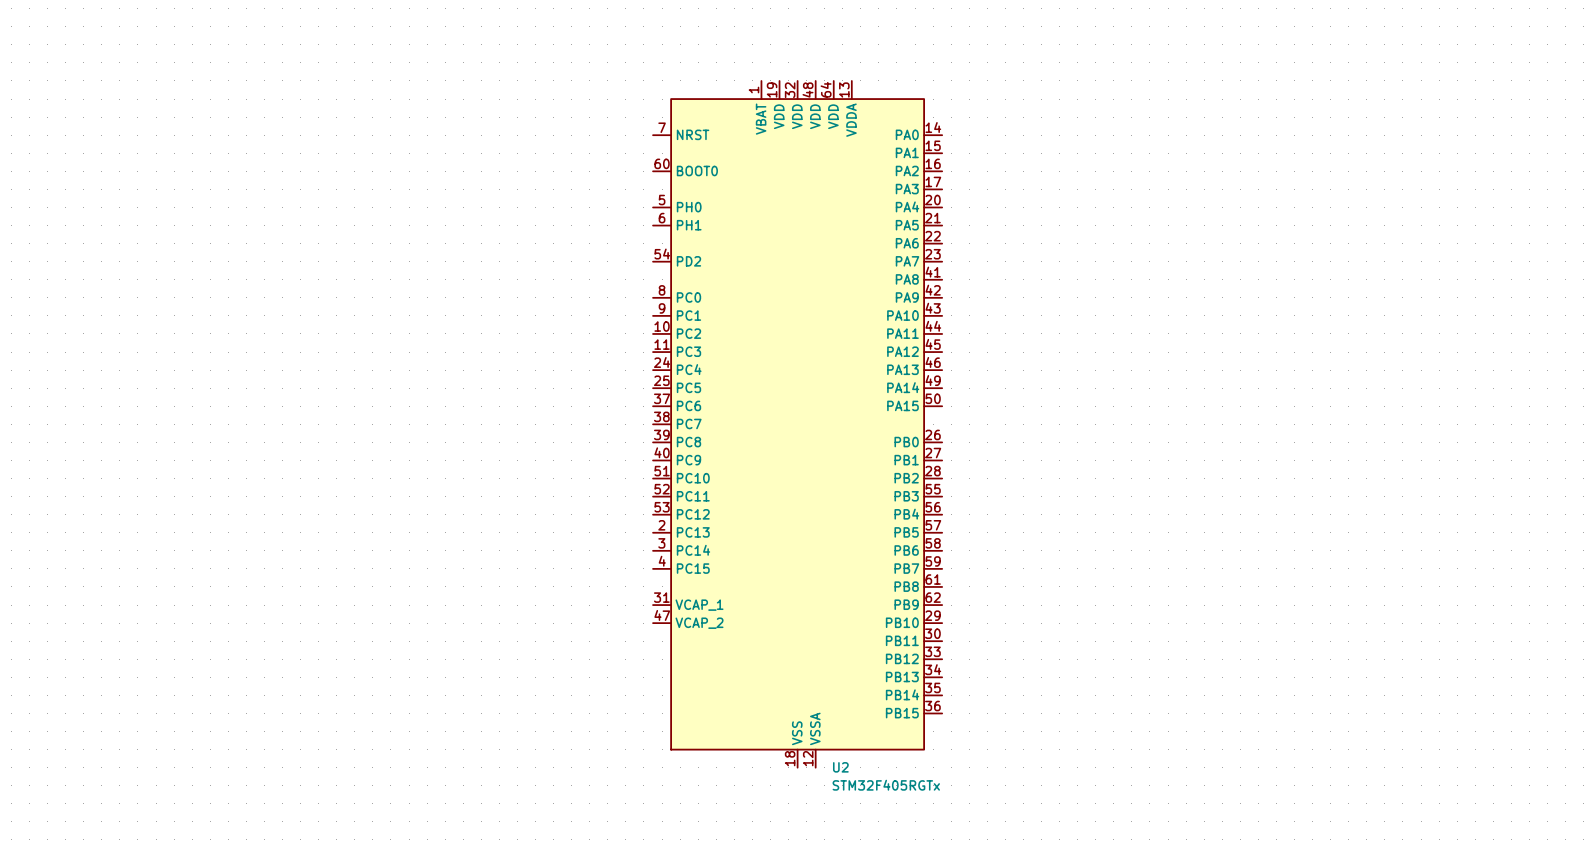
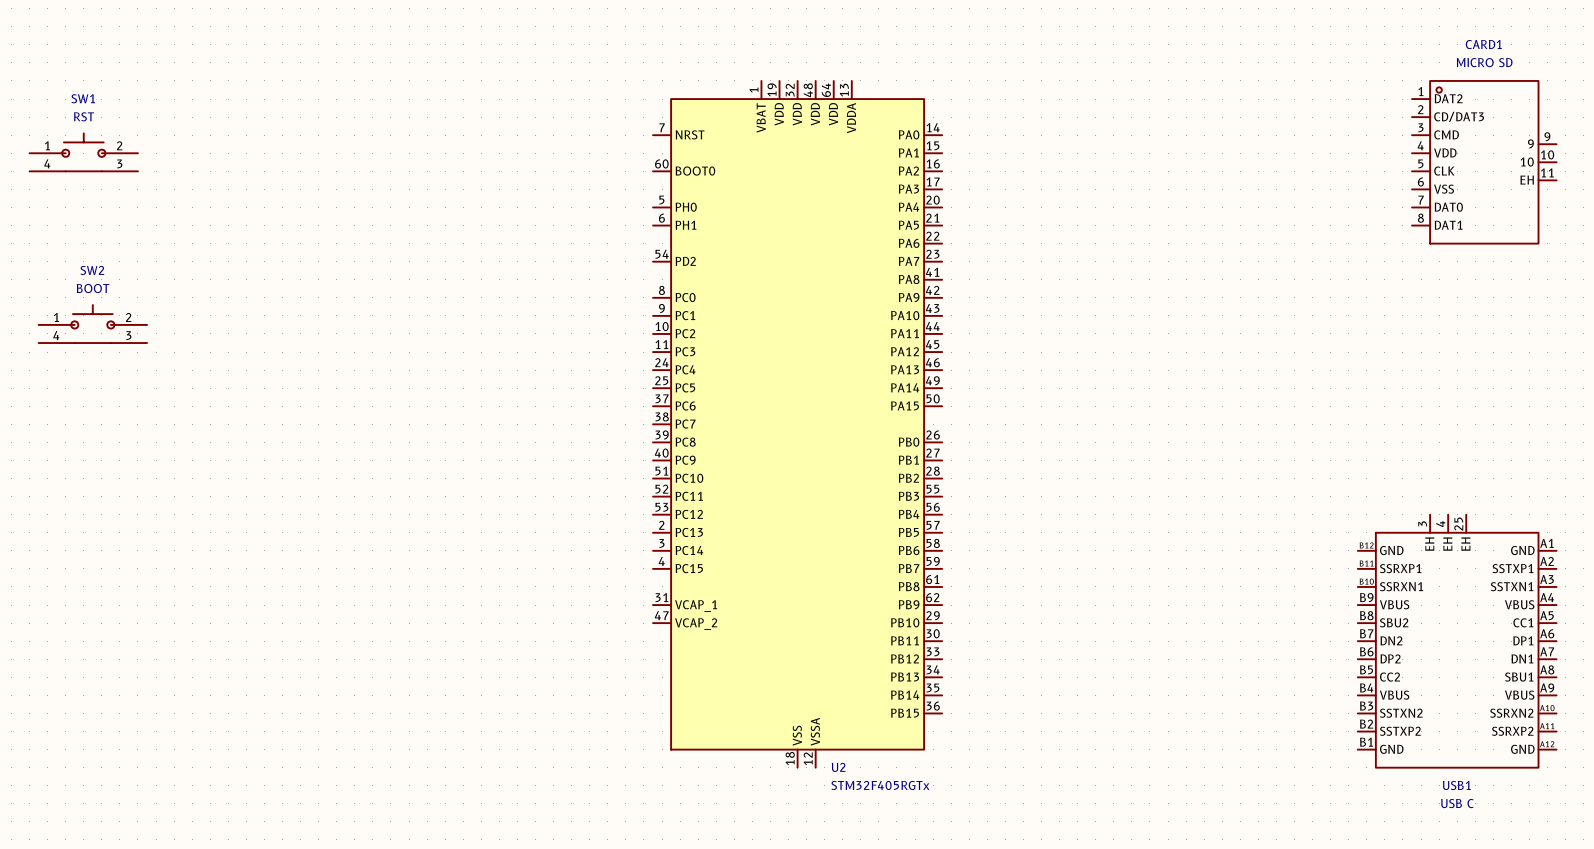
SW1: none -> RST (83, 152)
CARD1: none -> MICRO SD (1484, 162)
SW2: none -> BOOT (92, 324)
USB1: none -> USB C (1457, 641)

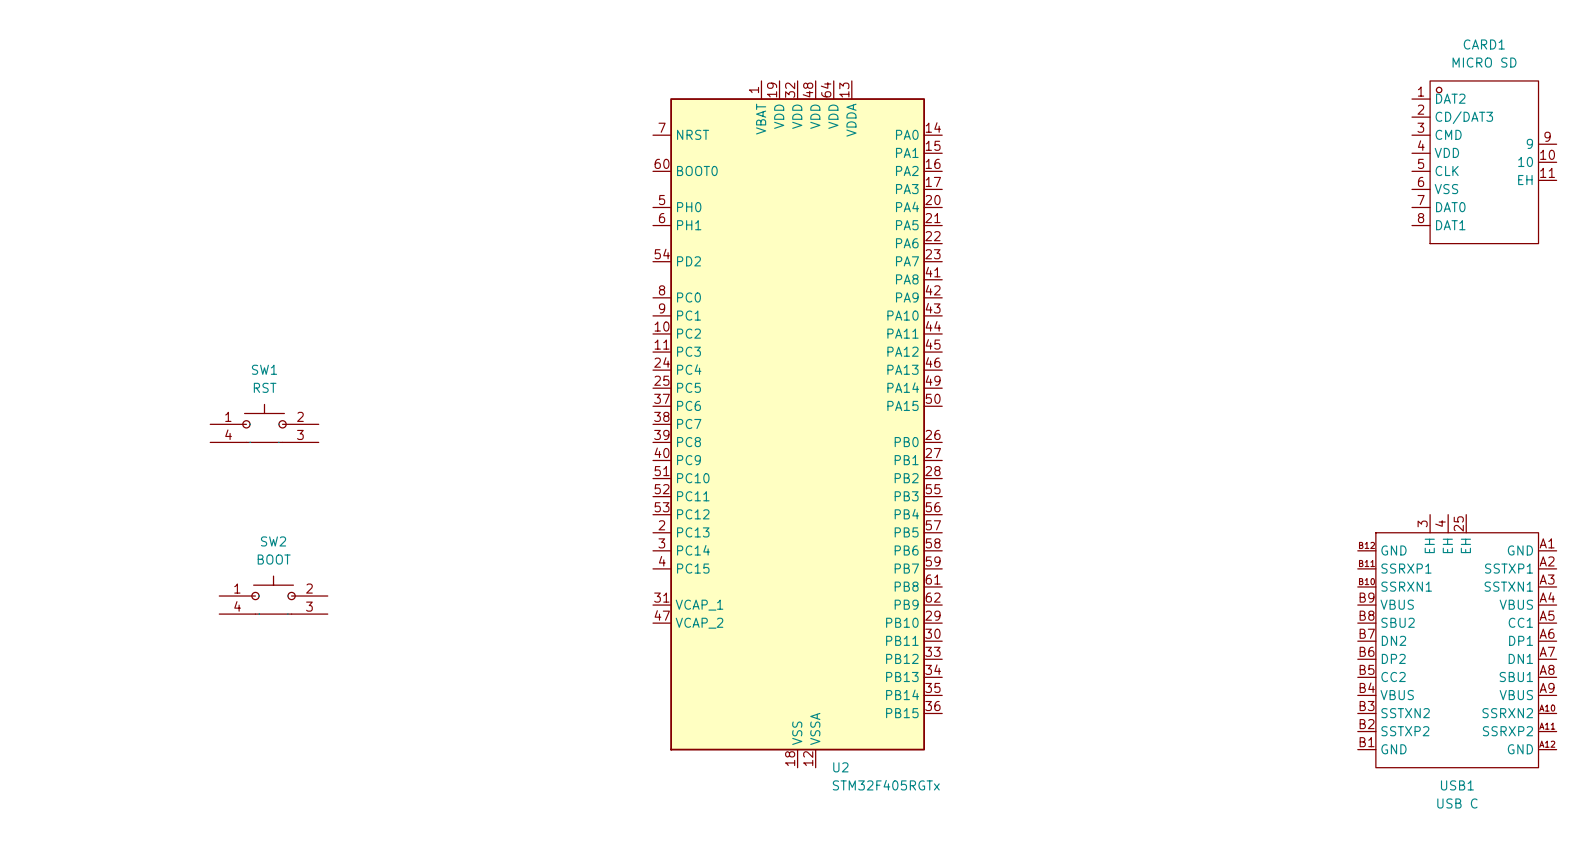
SW1 position: (83, 152) -> (264, 423)
SW2 position: (92, 324) -> (273, 595)

